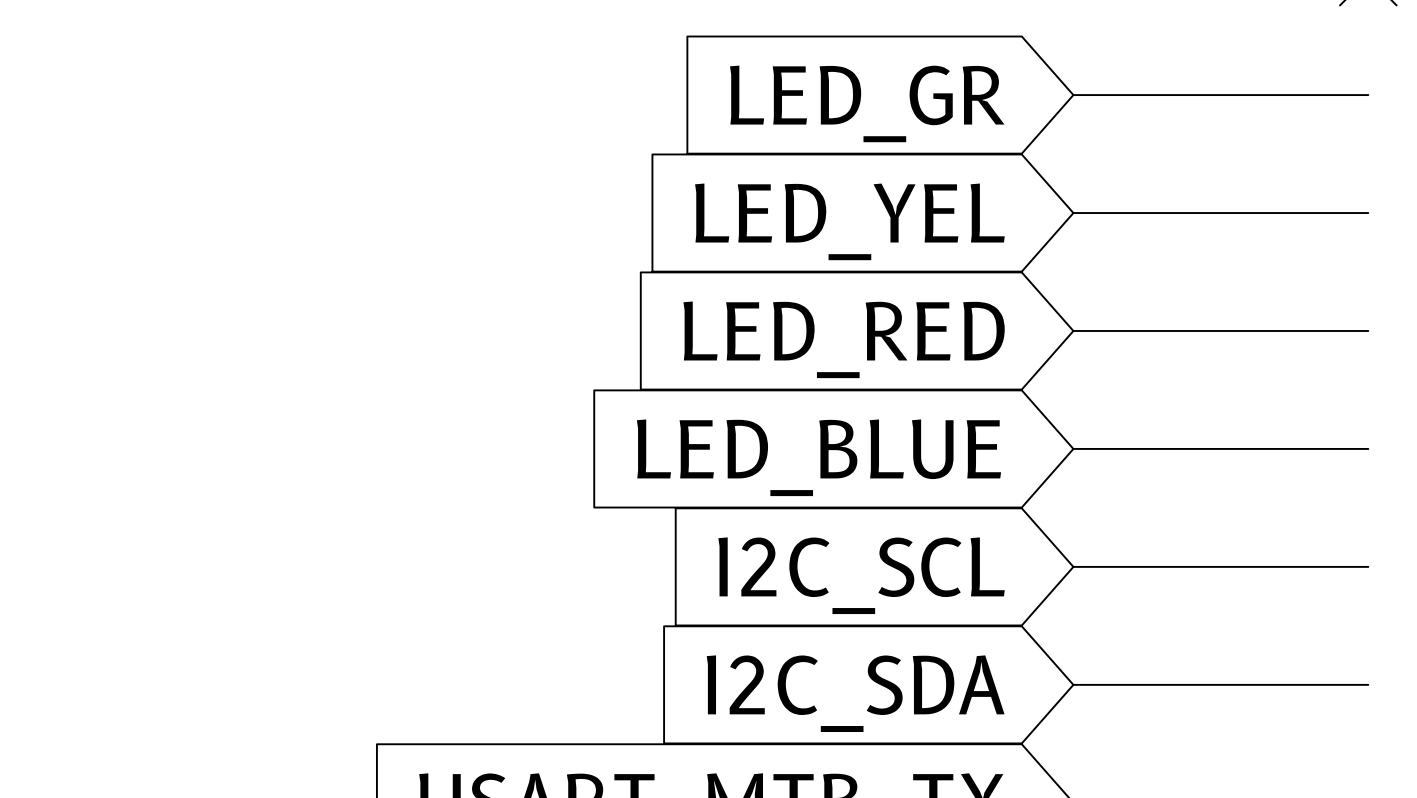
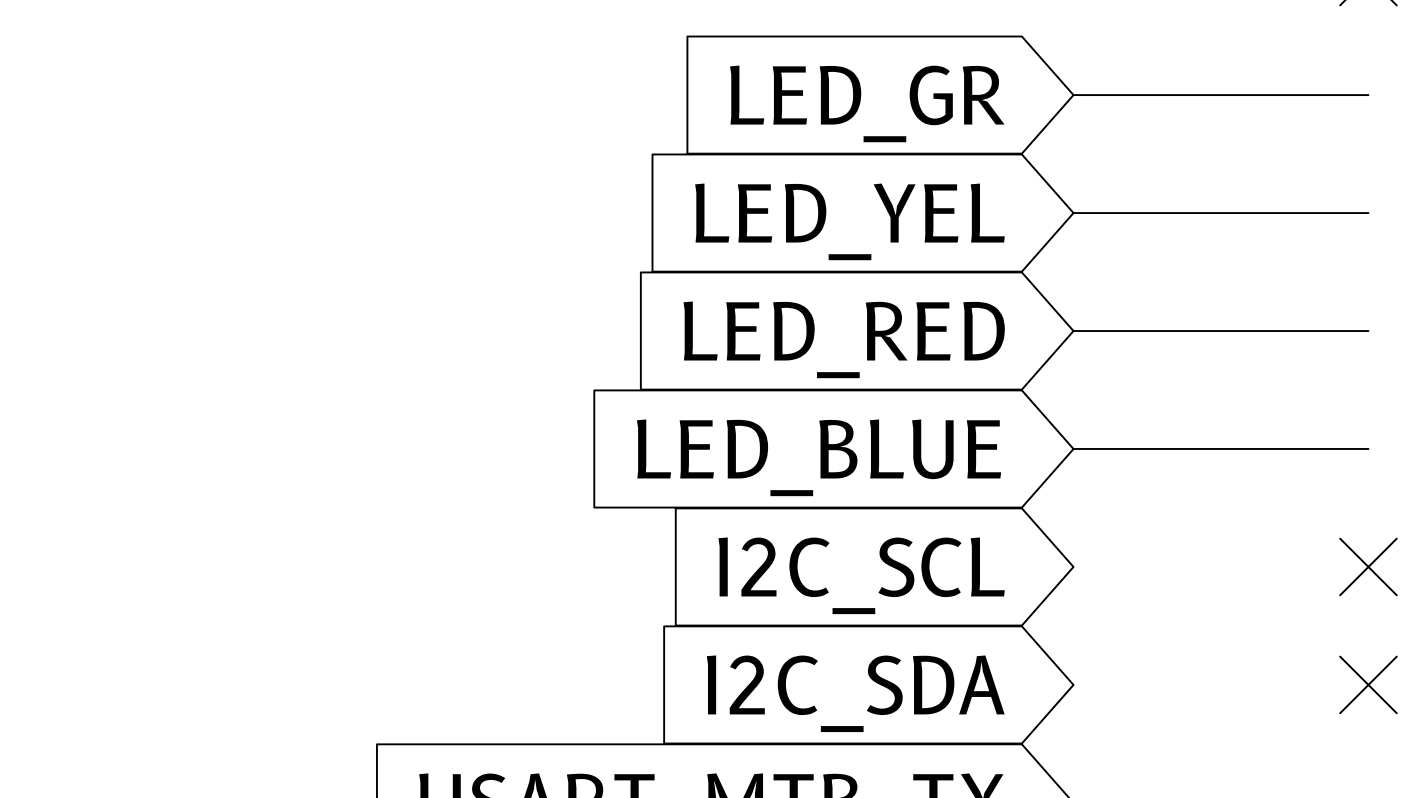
wire: (1073, 566) (1368, 566) -> none
no-connect mark: none -> (1368, 566)
wire: (1073, 684) (1368, 684) -> none
no-connect mark: none -> (1368, 684)

